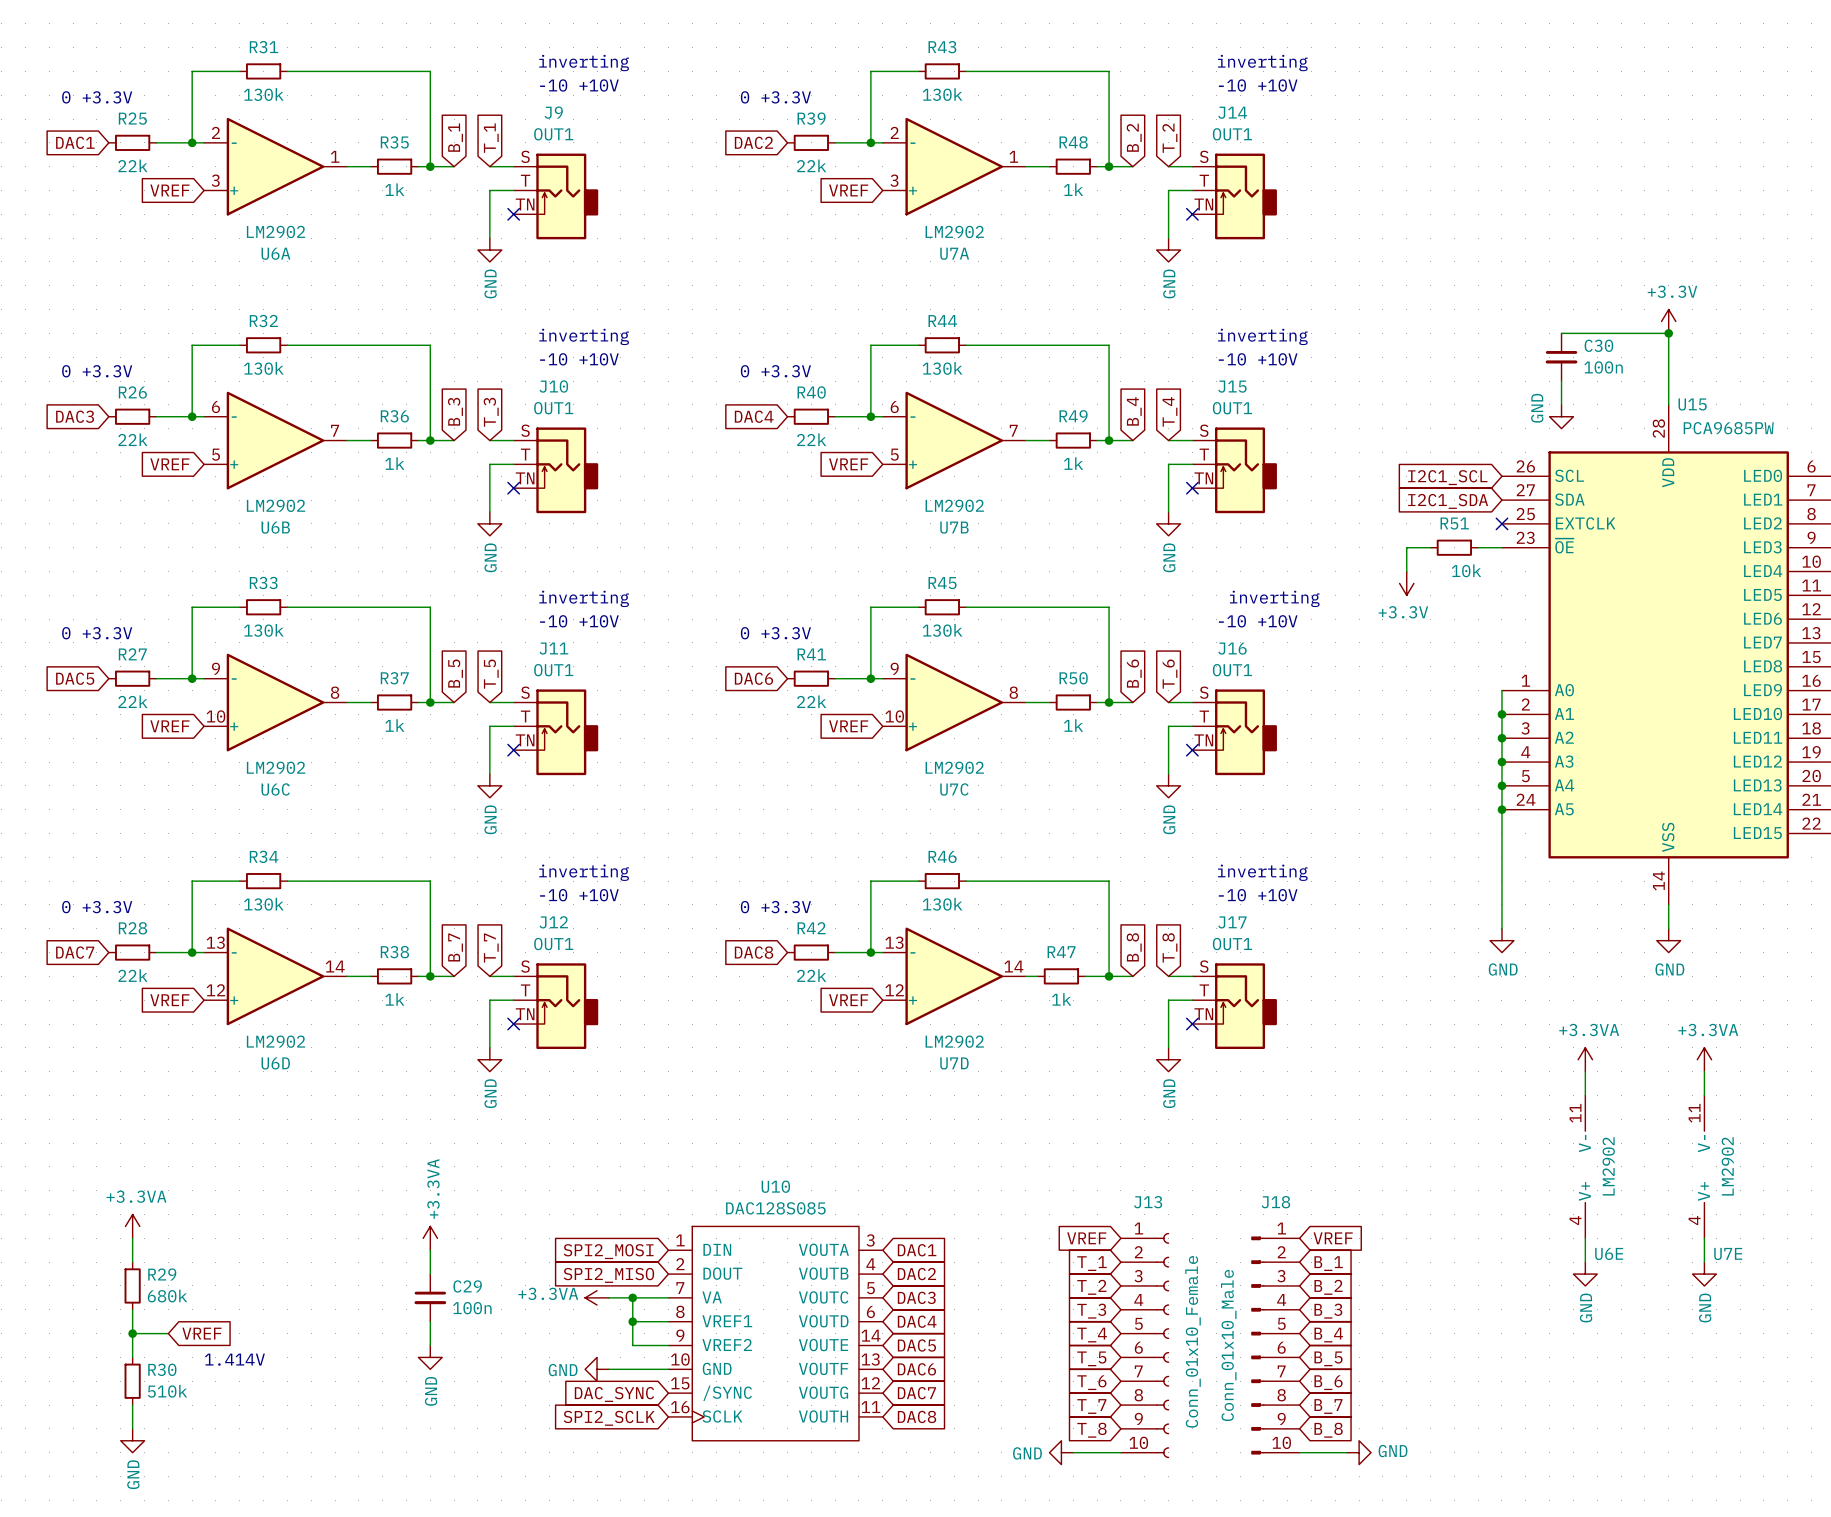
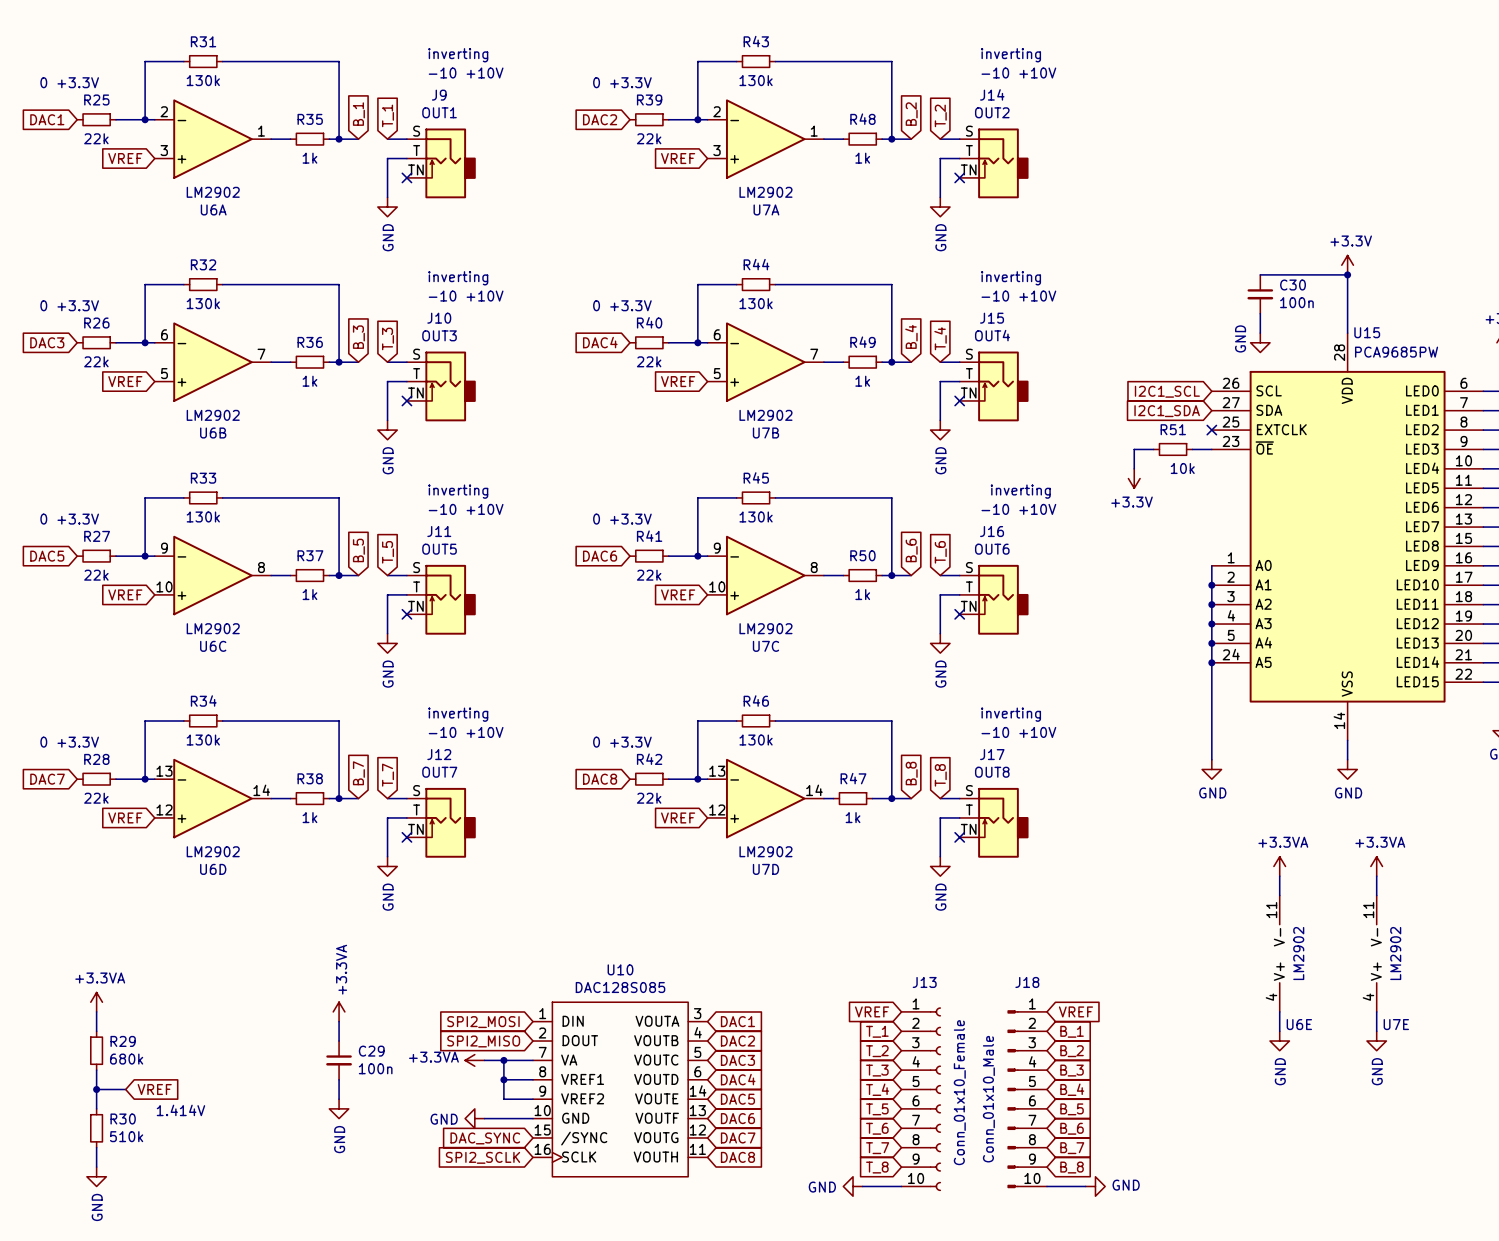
J14 value: OUT1 (1232, 134) -> OUT2 (992, 112)
J10 value: OUT1 (553, 408) -> OUT3 (439, 335)
J15 value: OUT1 (1232, 408) -> OUT4 (992, 335)
J11 value: OUT1 (553, 670) -> OUT5 (439, 549)
J16 value: OUT1 (1232, 670) -> OUT6 (992, 549)
J12 value: OUT1 (553, 944) -> OUT7 (439, 772)
J17 value: OUT1 (1232, 944) -> OUT8 (992, 772)

